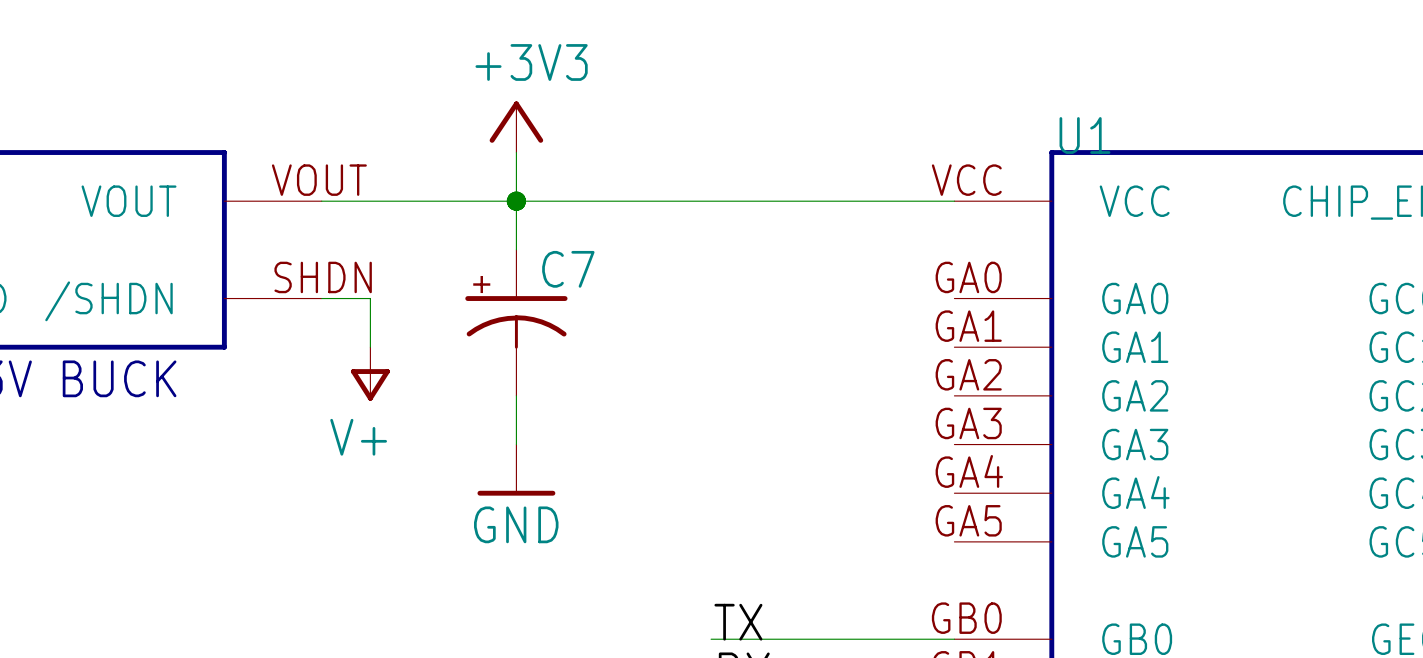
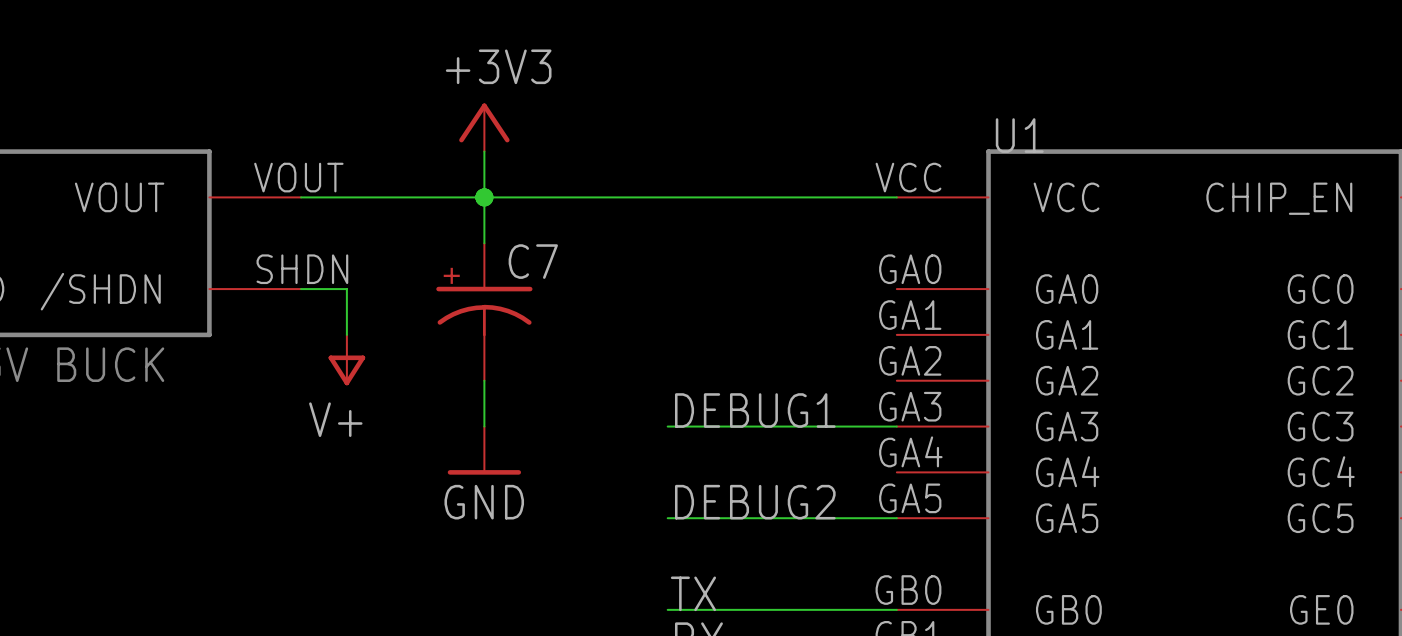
label: none -> DEBUG1 (755, 410)
wire: none -> (667, 426) (896, 426)
label: none -> DEBUG2 (755, 502)
wire: none -> (667, 518) (896, 518)

